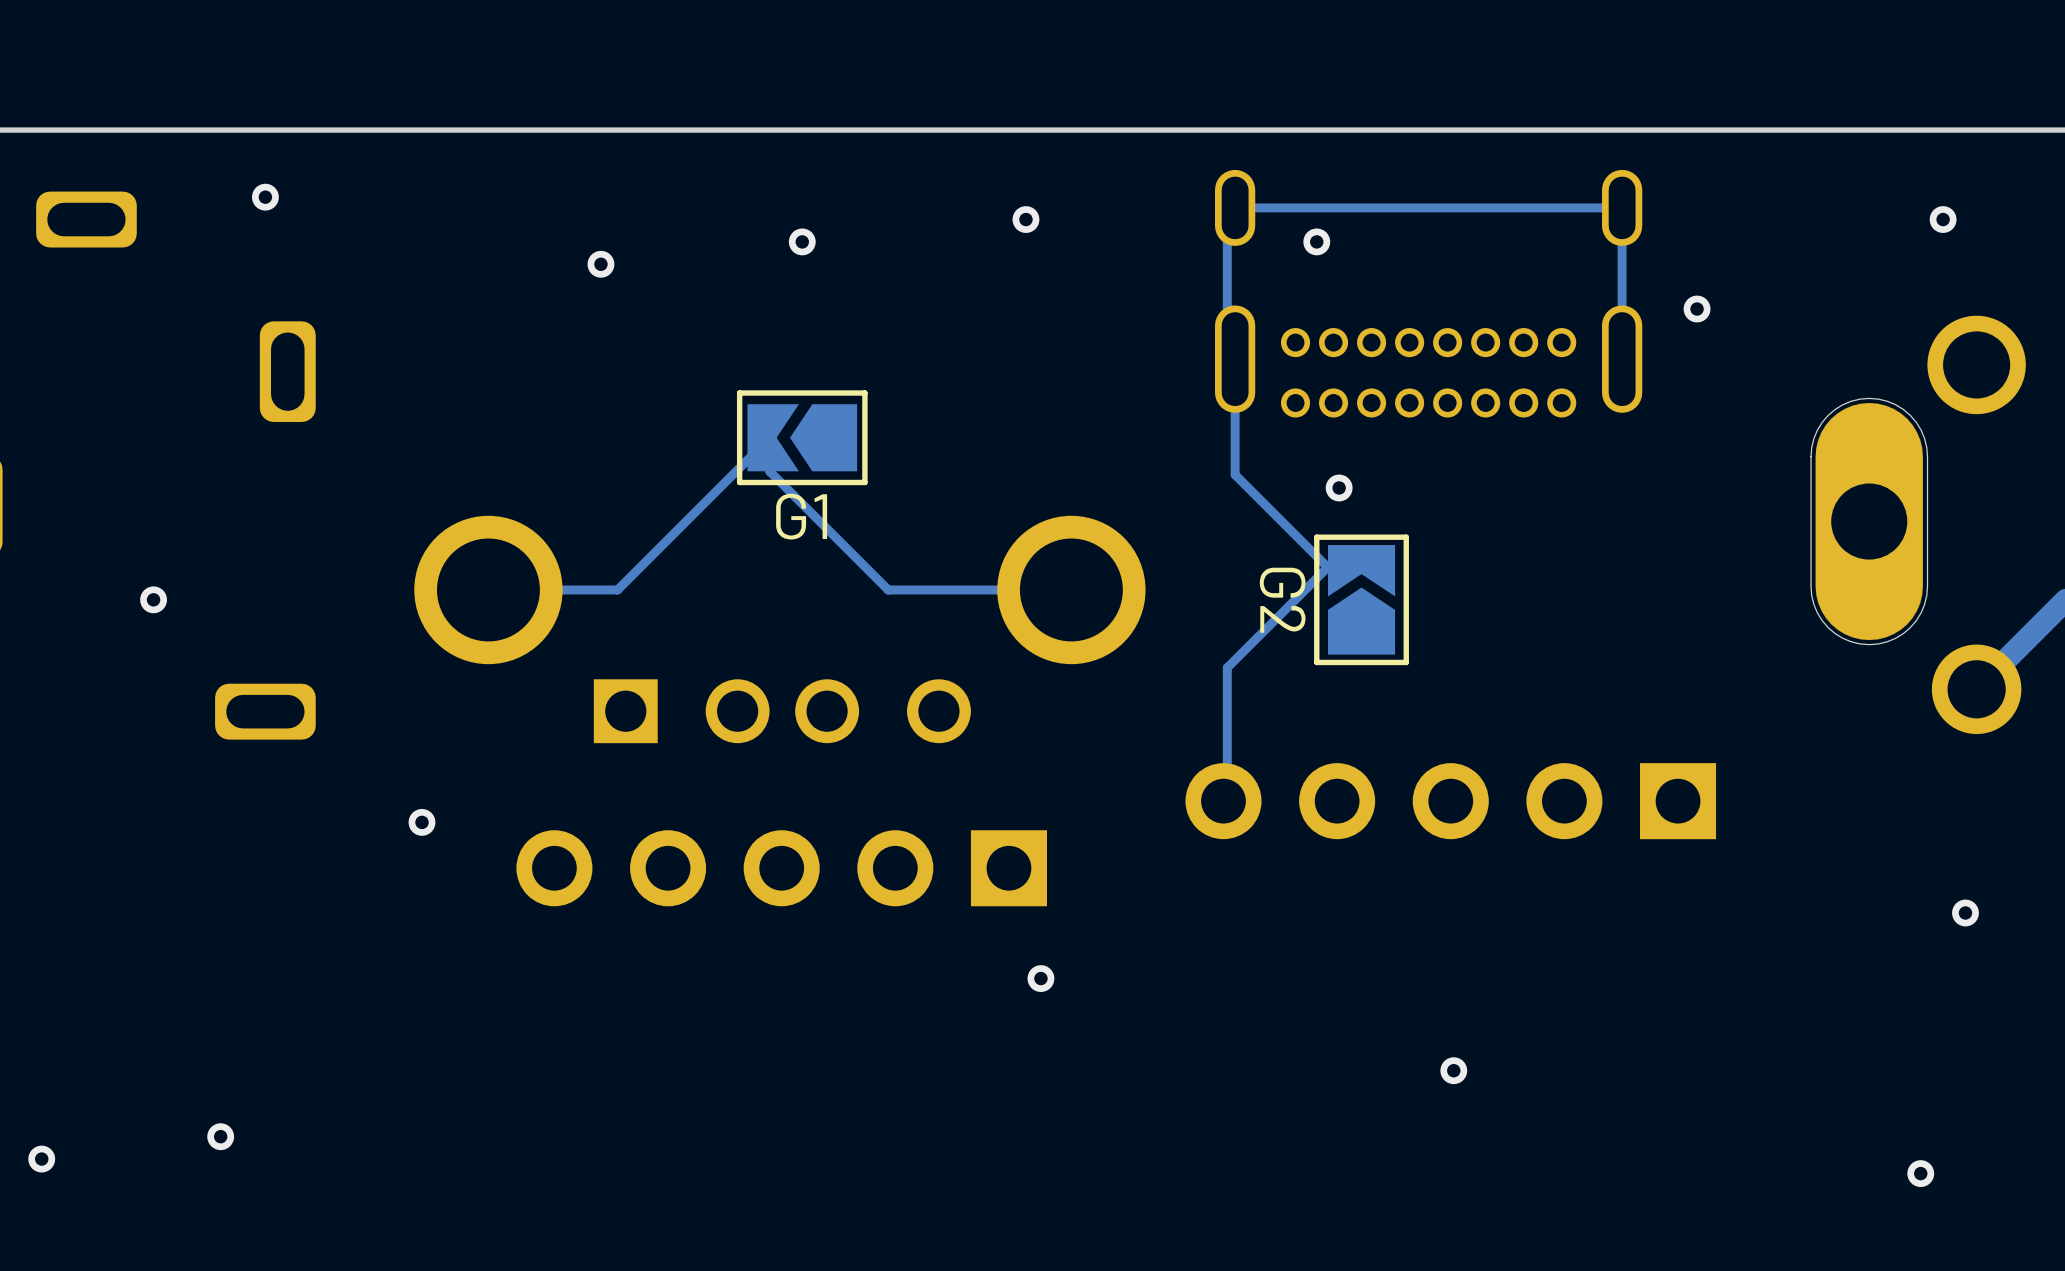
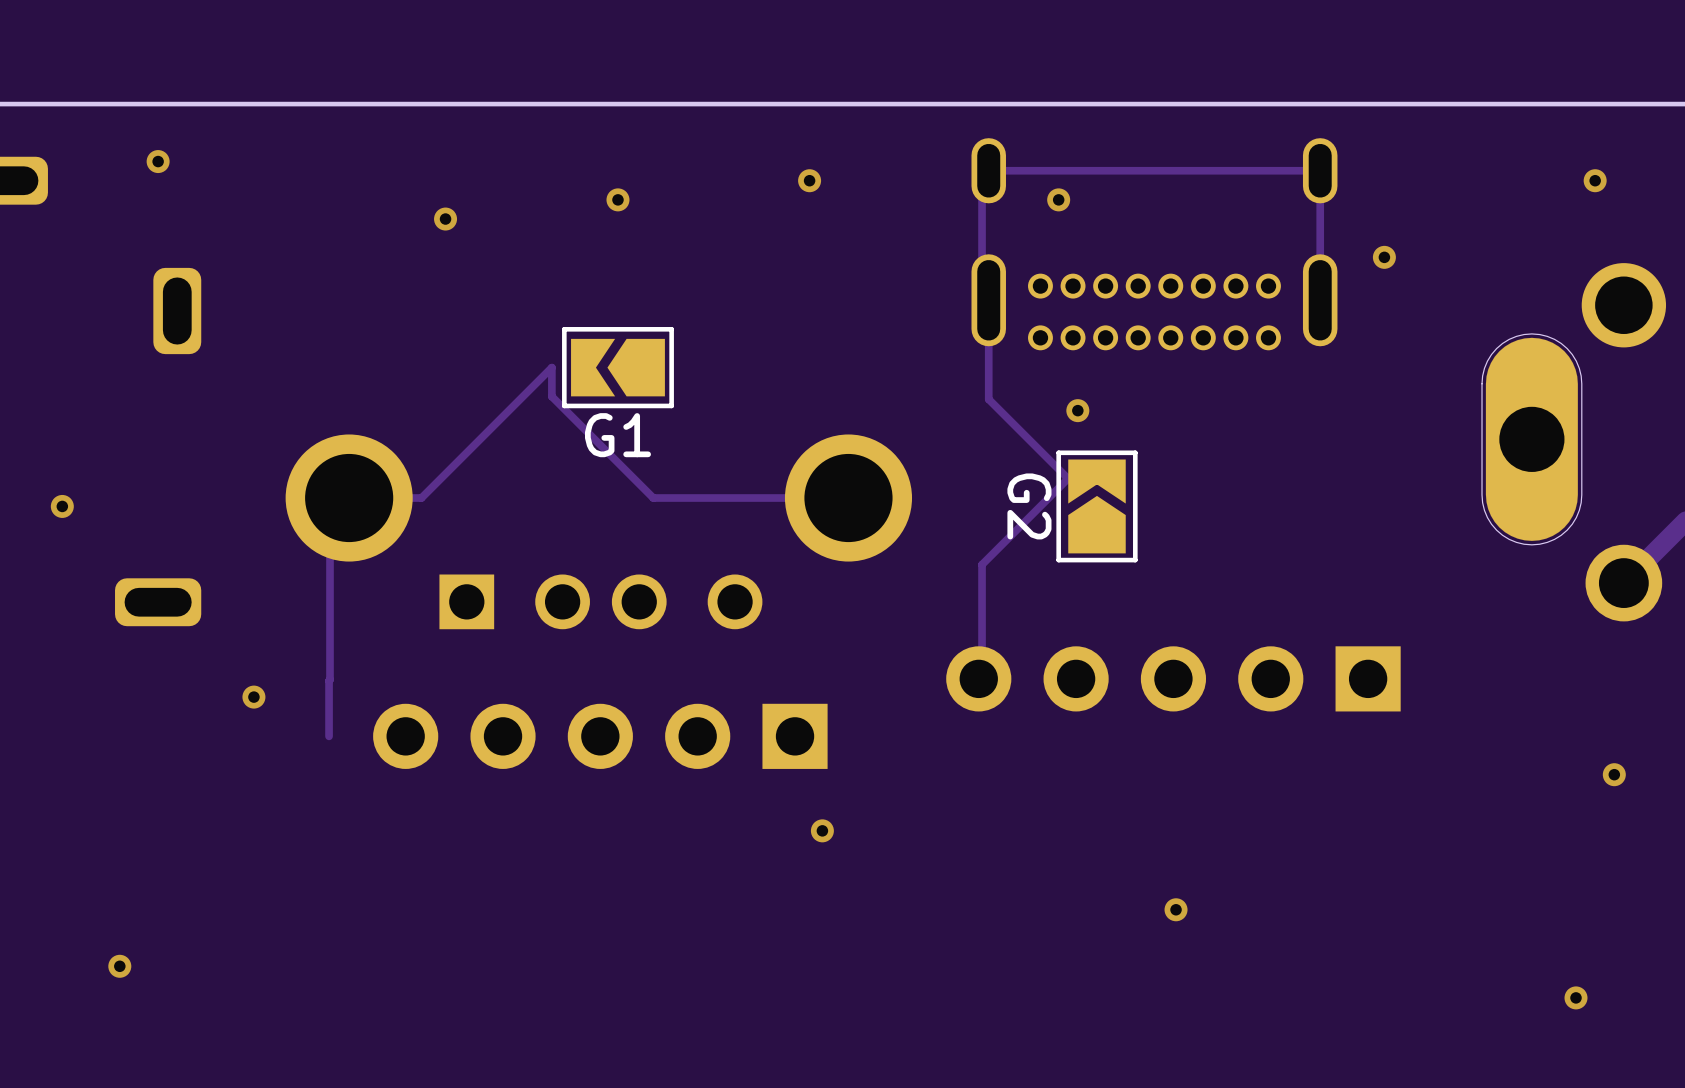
track: none -> (349, 498) (330, 498) (329, 736)
track: (888, 589) (769, 471) (769, 437) (617, 589) (572, 589) -> (691, 498) (653, 498) (551, 396) (551, 367) (421, 498)
via position: (422, 822) -> (253, 697)

